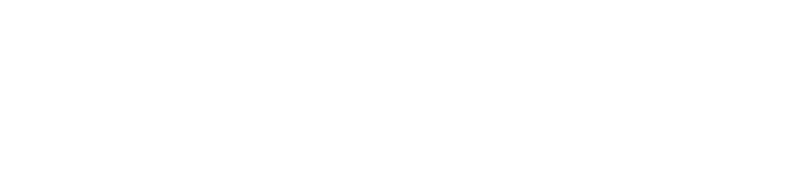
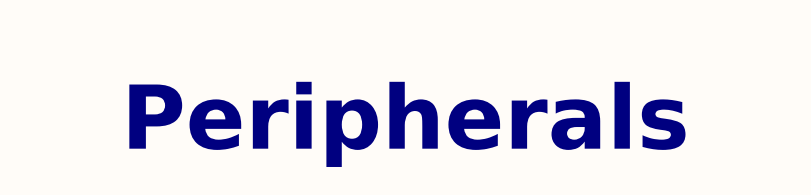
text: none -> Peripherals (407, 124)

